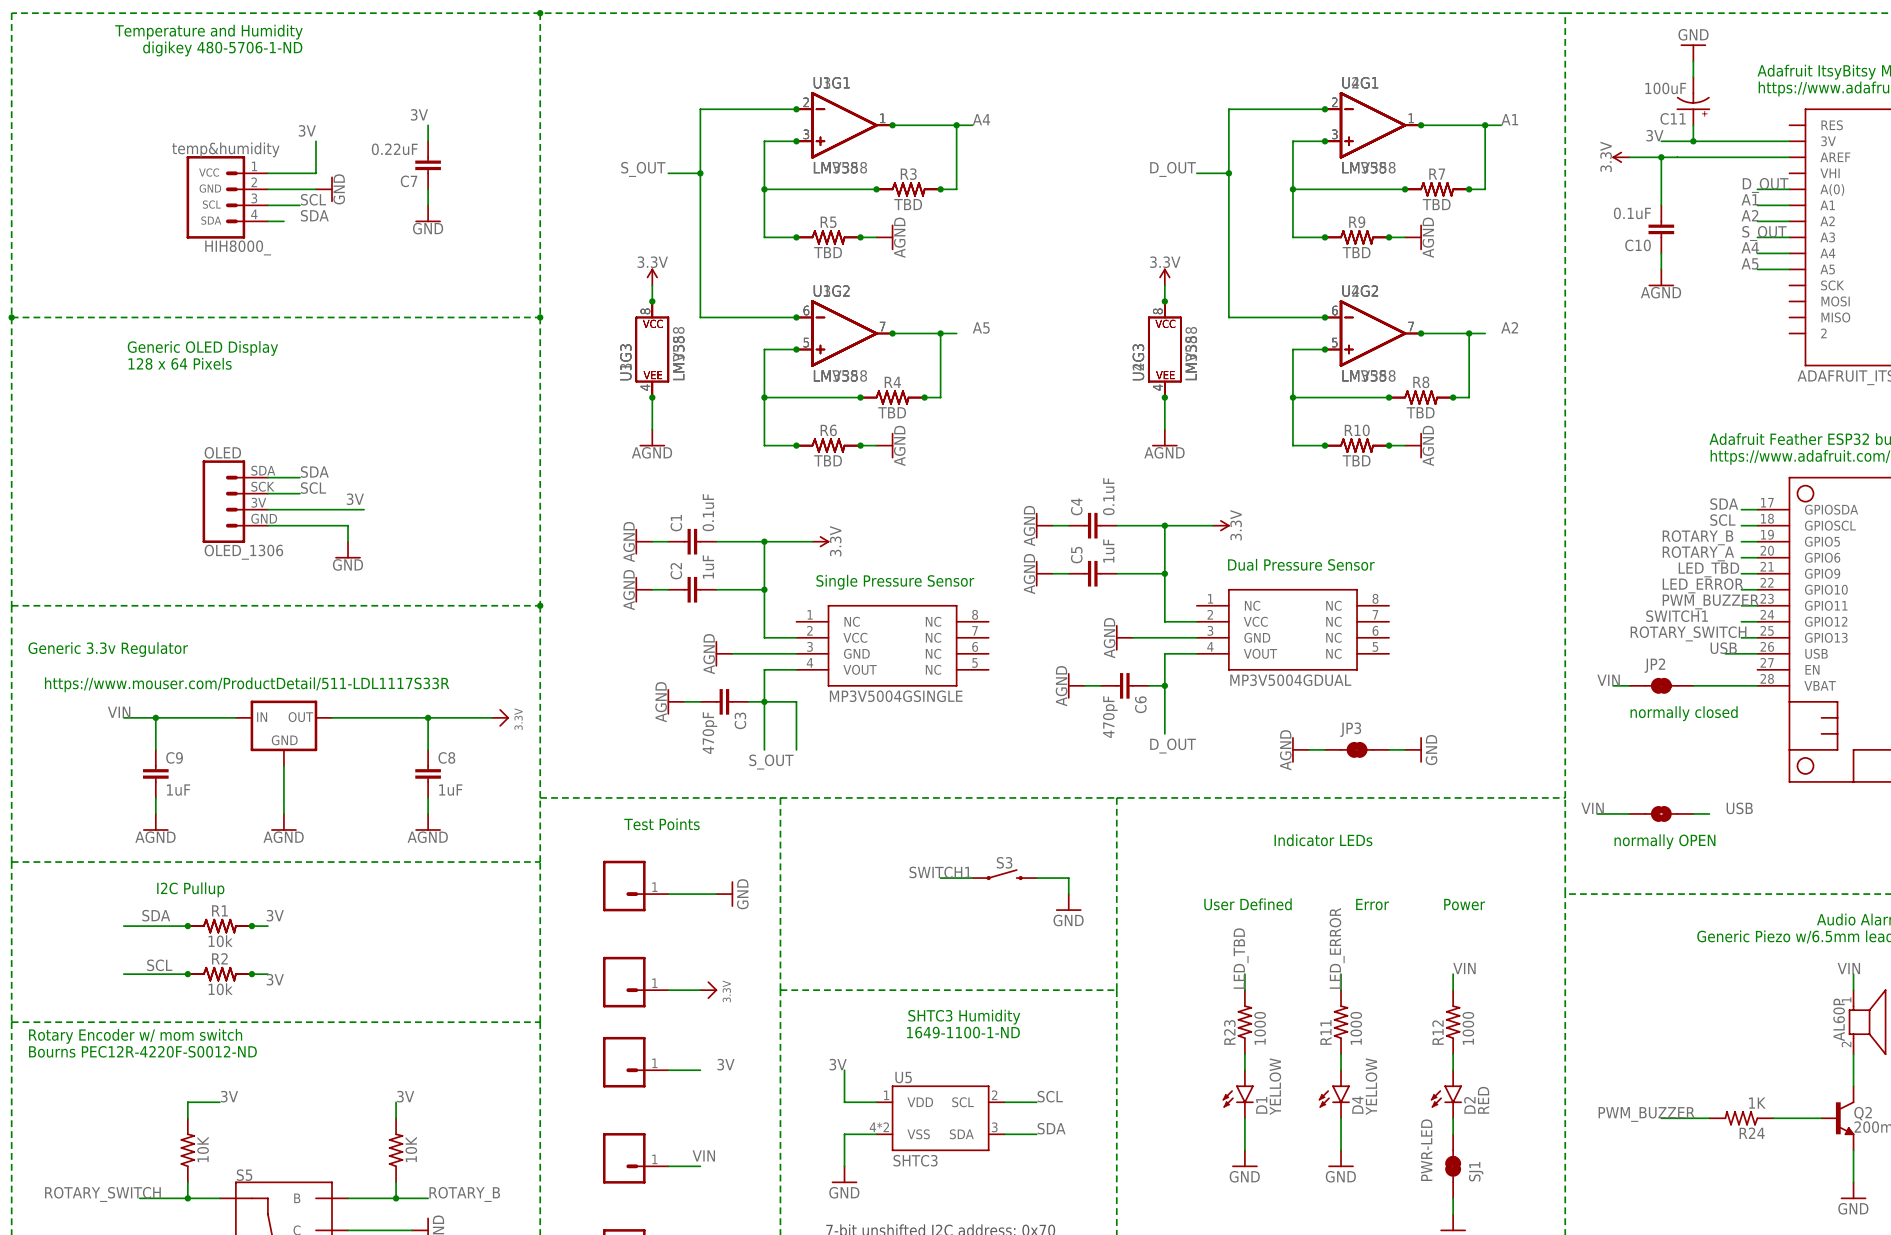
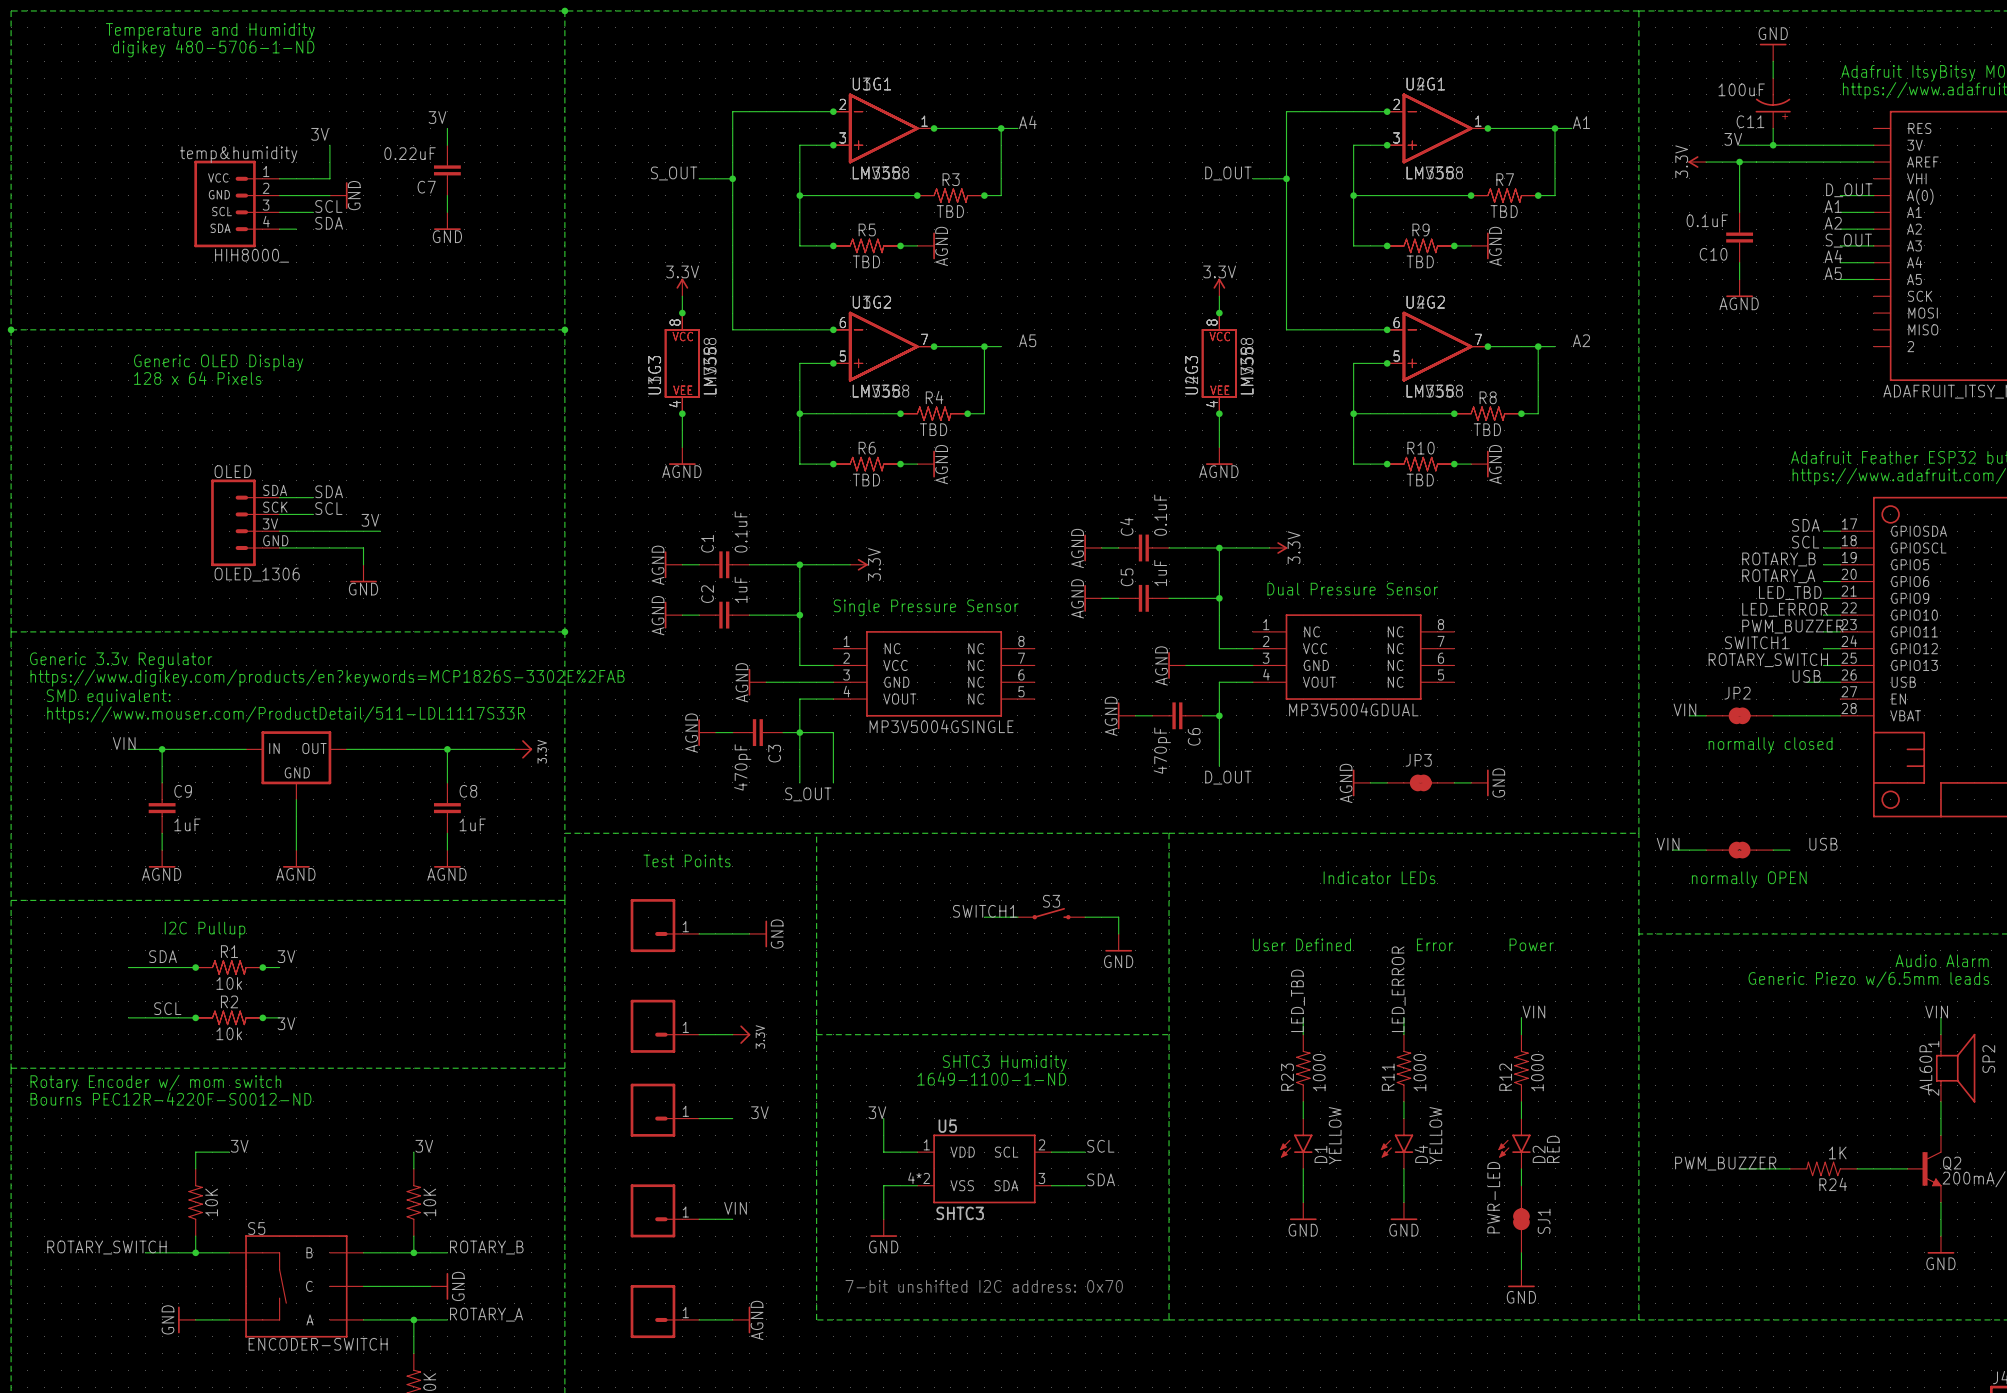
text: none -> Generic 3.3v Regulator (121, 660)
text: Generic 3.3v Regulator (108, 649) -> https://www.digikey.com/products/en?keywords=MCP1826S-3302E%2FAB (327, 678)
text: none -> SMD equivalent: (108, 697)

